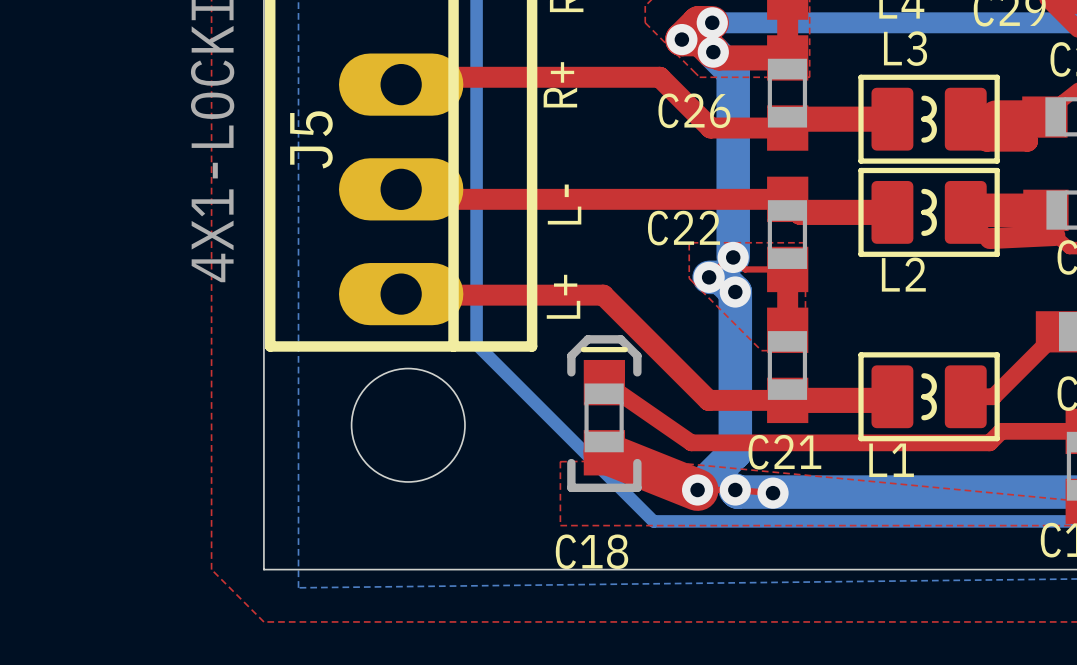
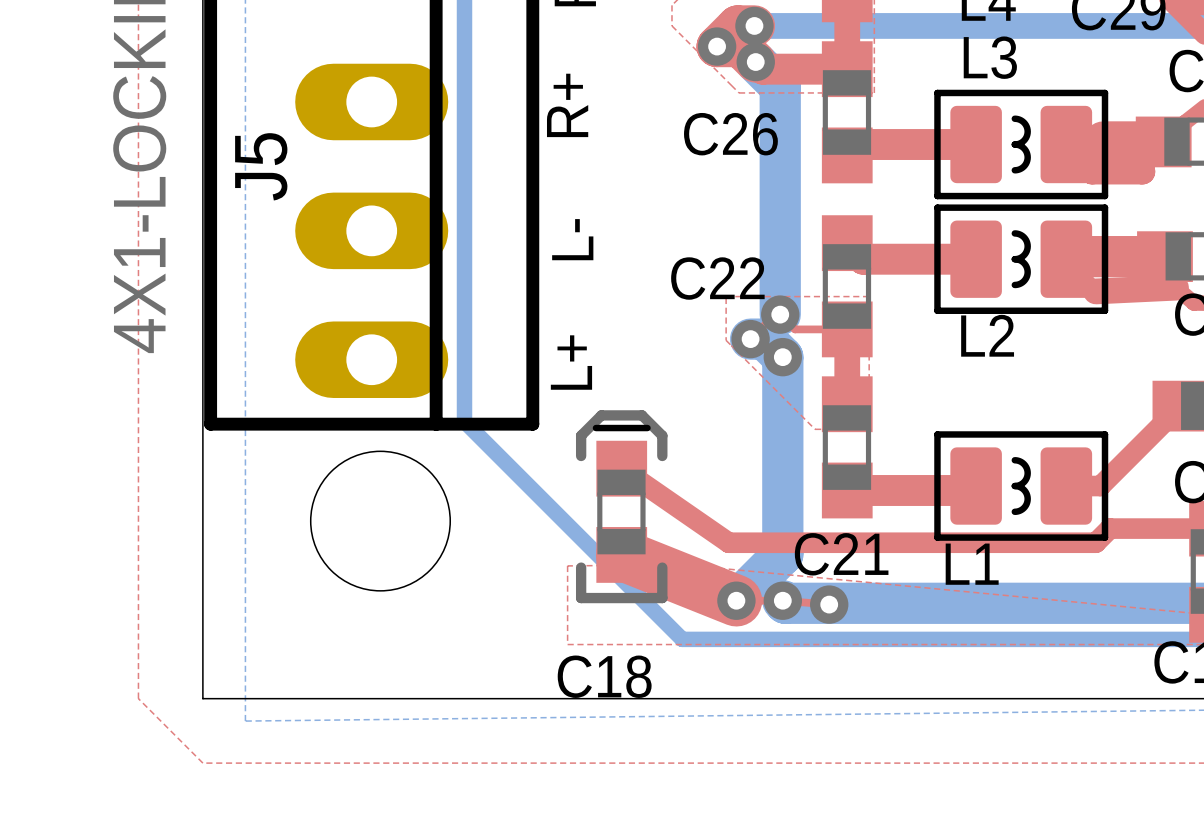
top track: (401, 84) (408, 77) (659, 77) (710, 128) (787, 128) -> none
top track: (401, 189) (411, 199) (787, 199) -> none
top track: (401, 294) (603, 295) (708, 400) (787, 400) -> none

